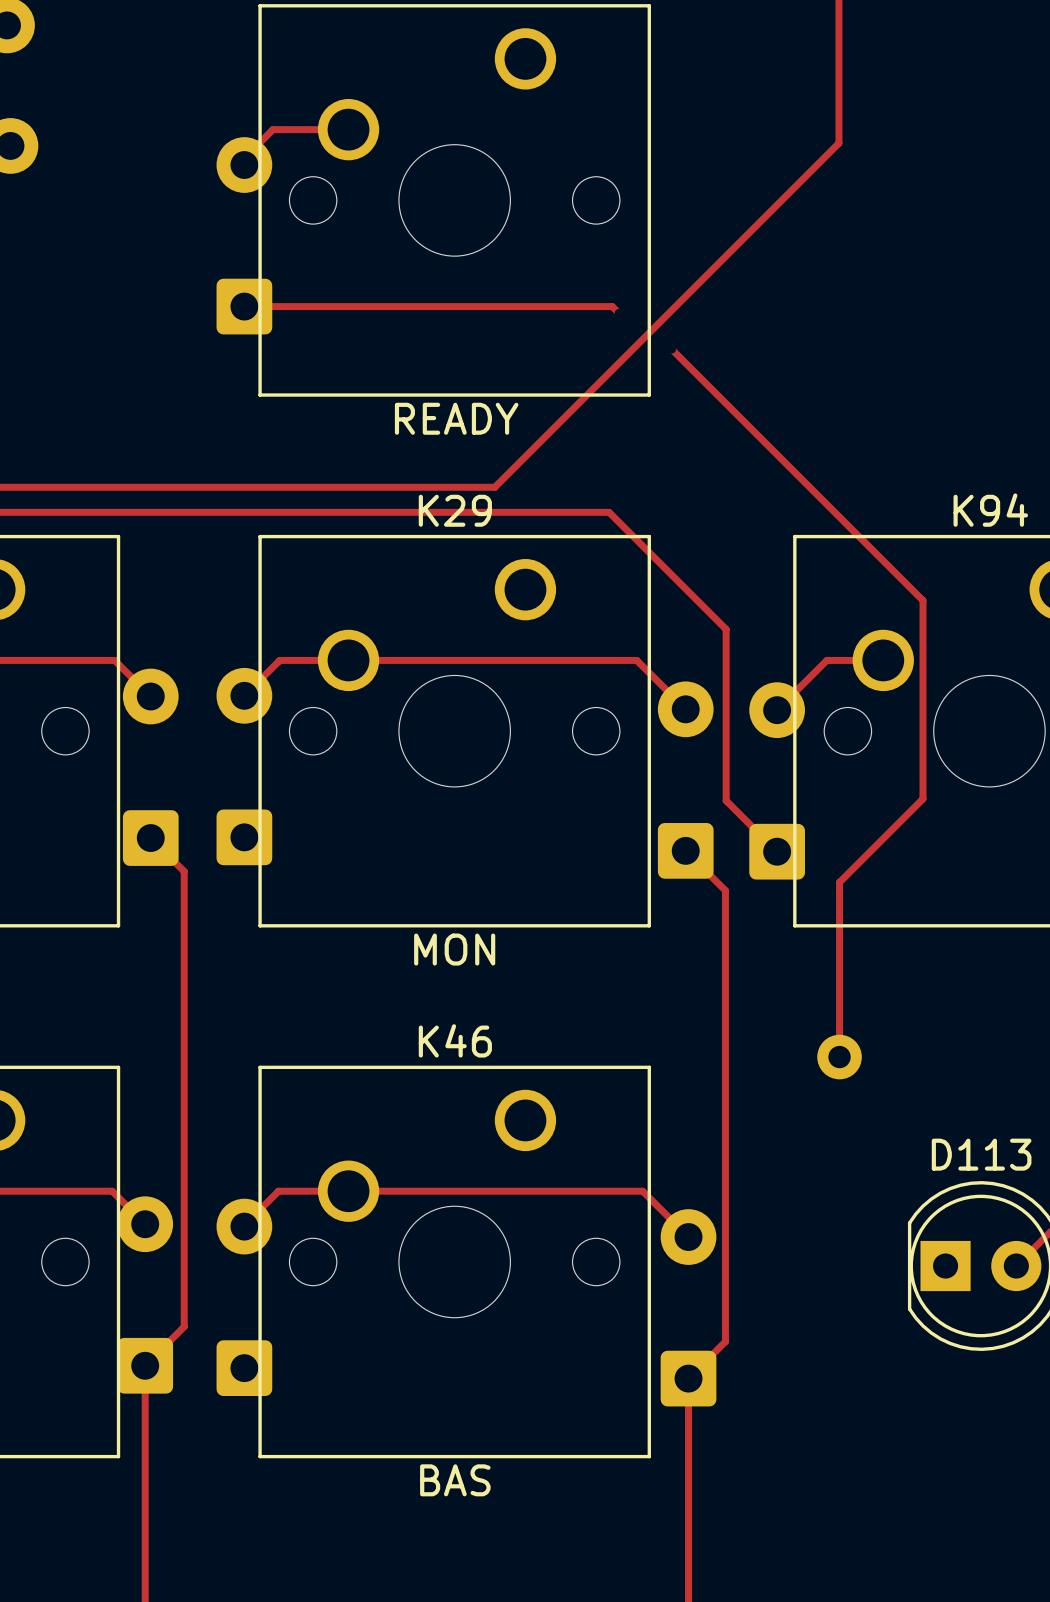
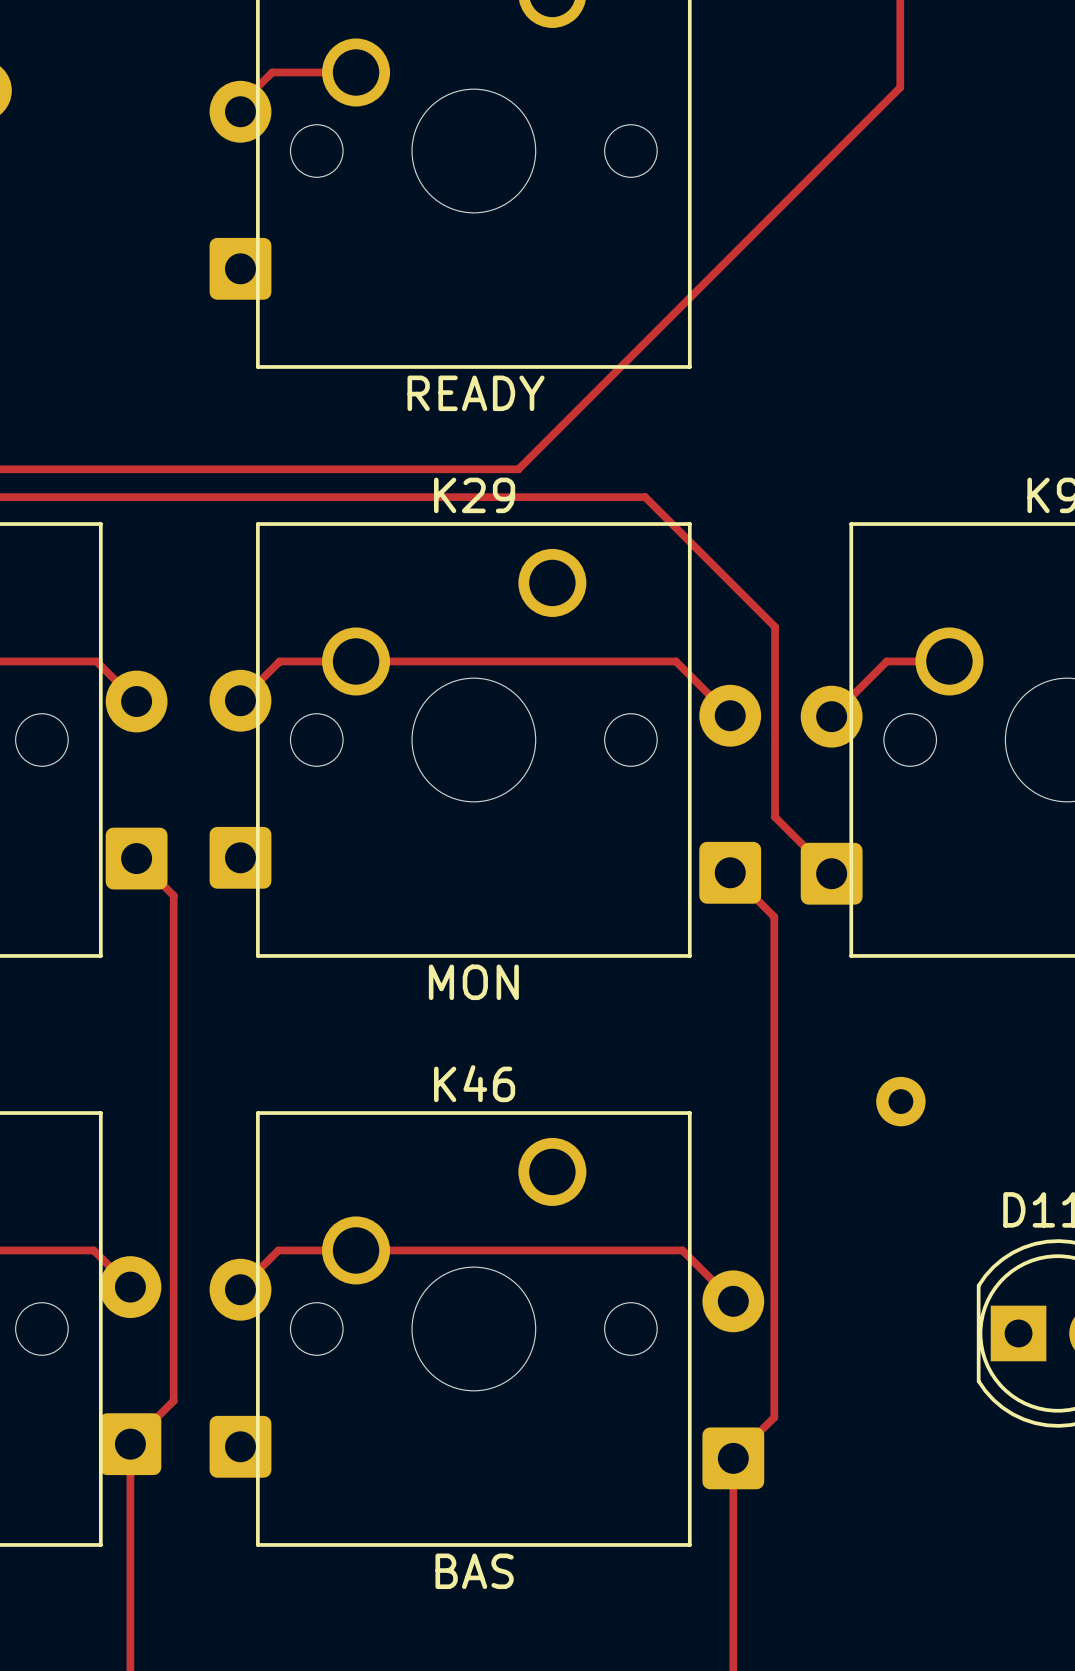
track: (244, 306) (612, 306) (618, 313) -> none
via: (618, 313) -> none
track: (671, 349) (922, 600) (922, 798) (839, 882) (839, 1057) -> none
via: (671, 349) -> none

